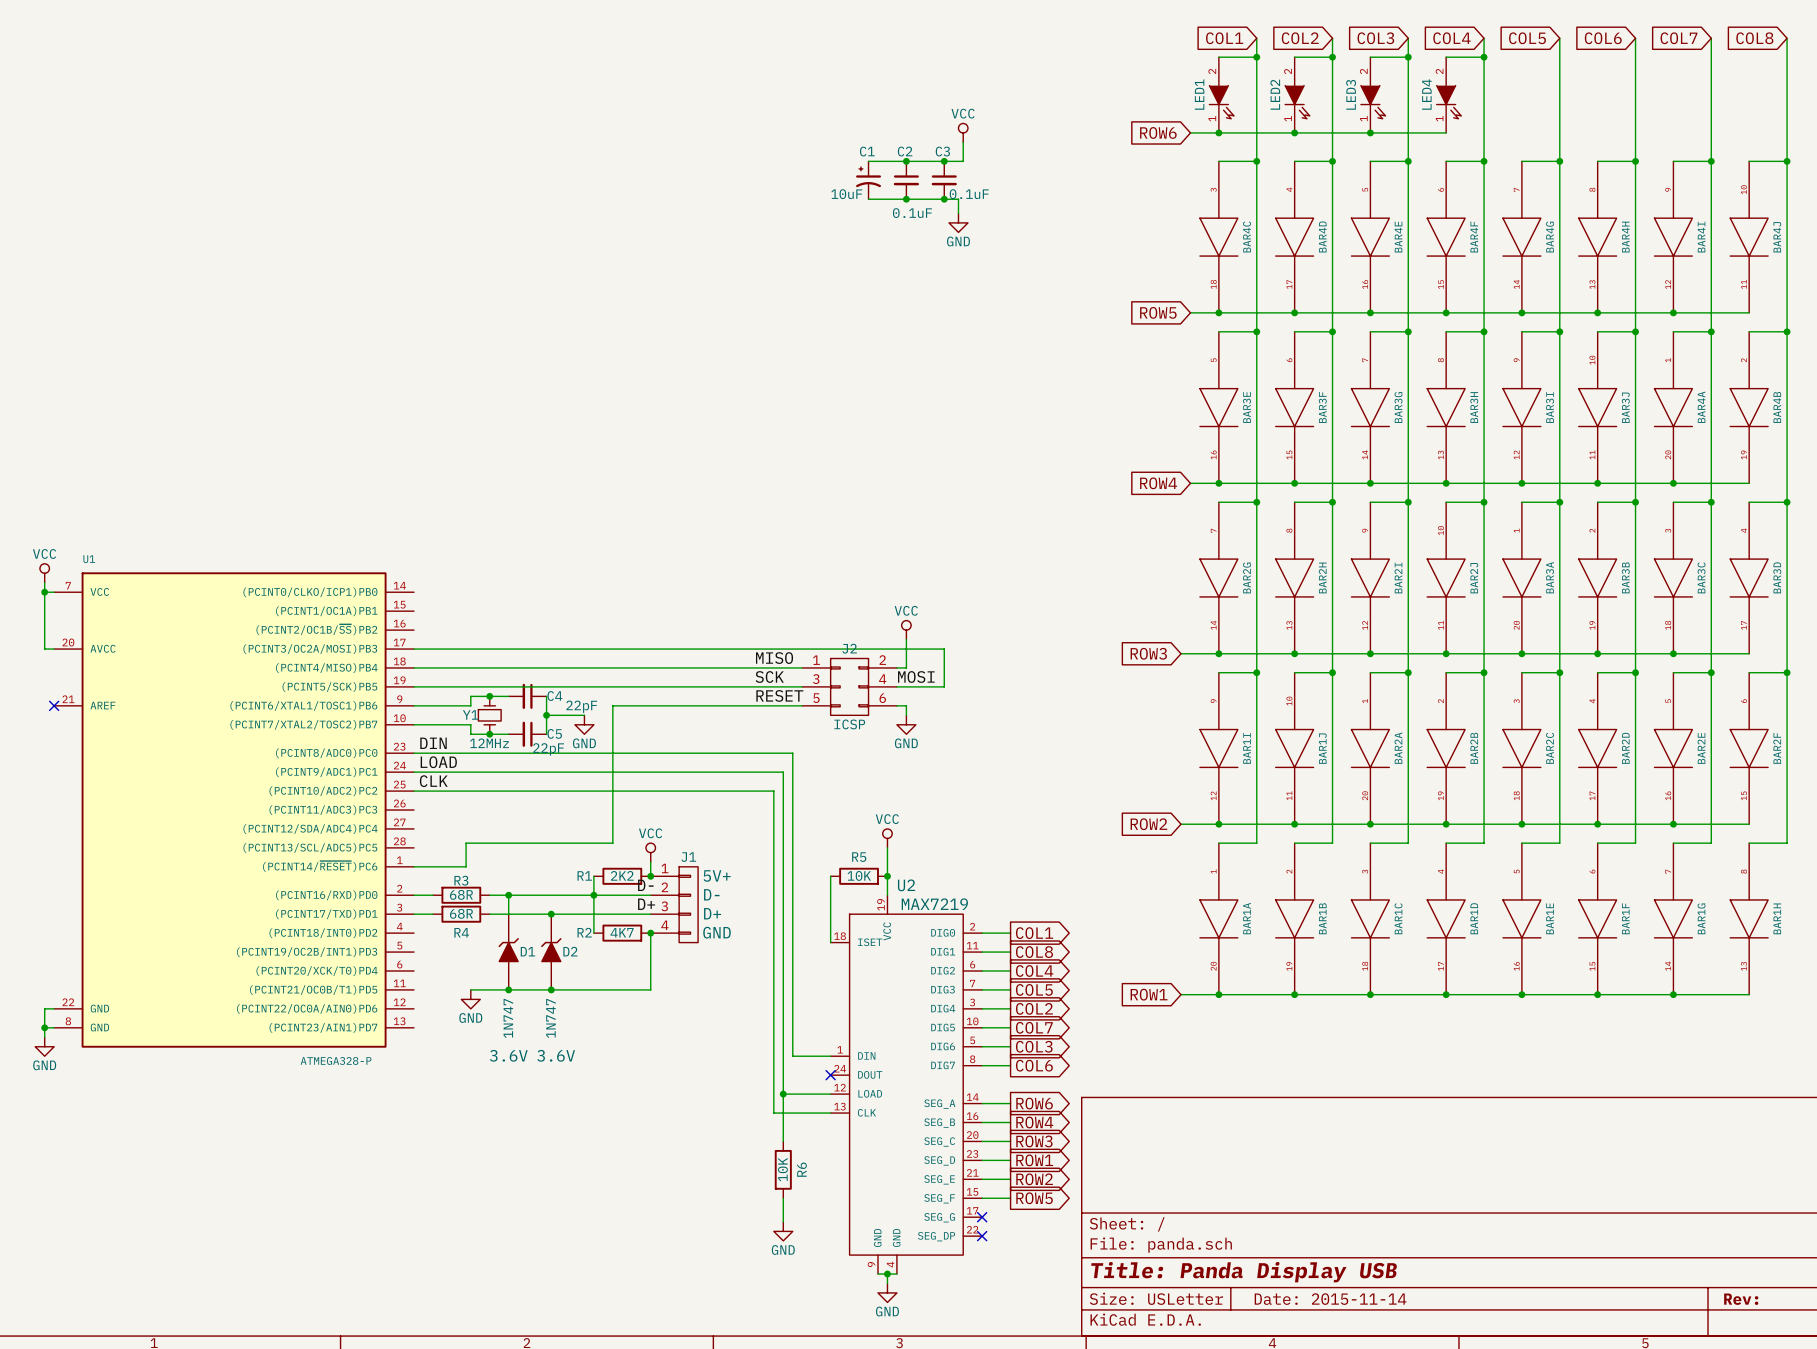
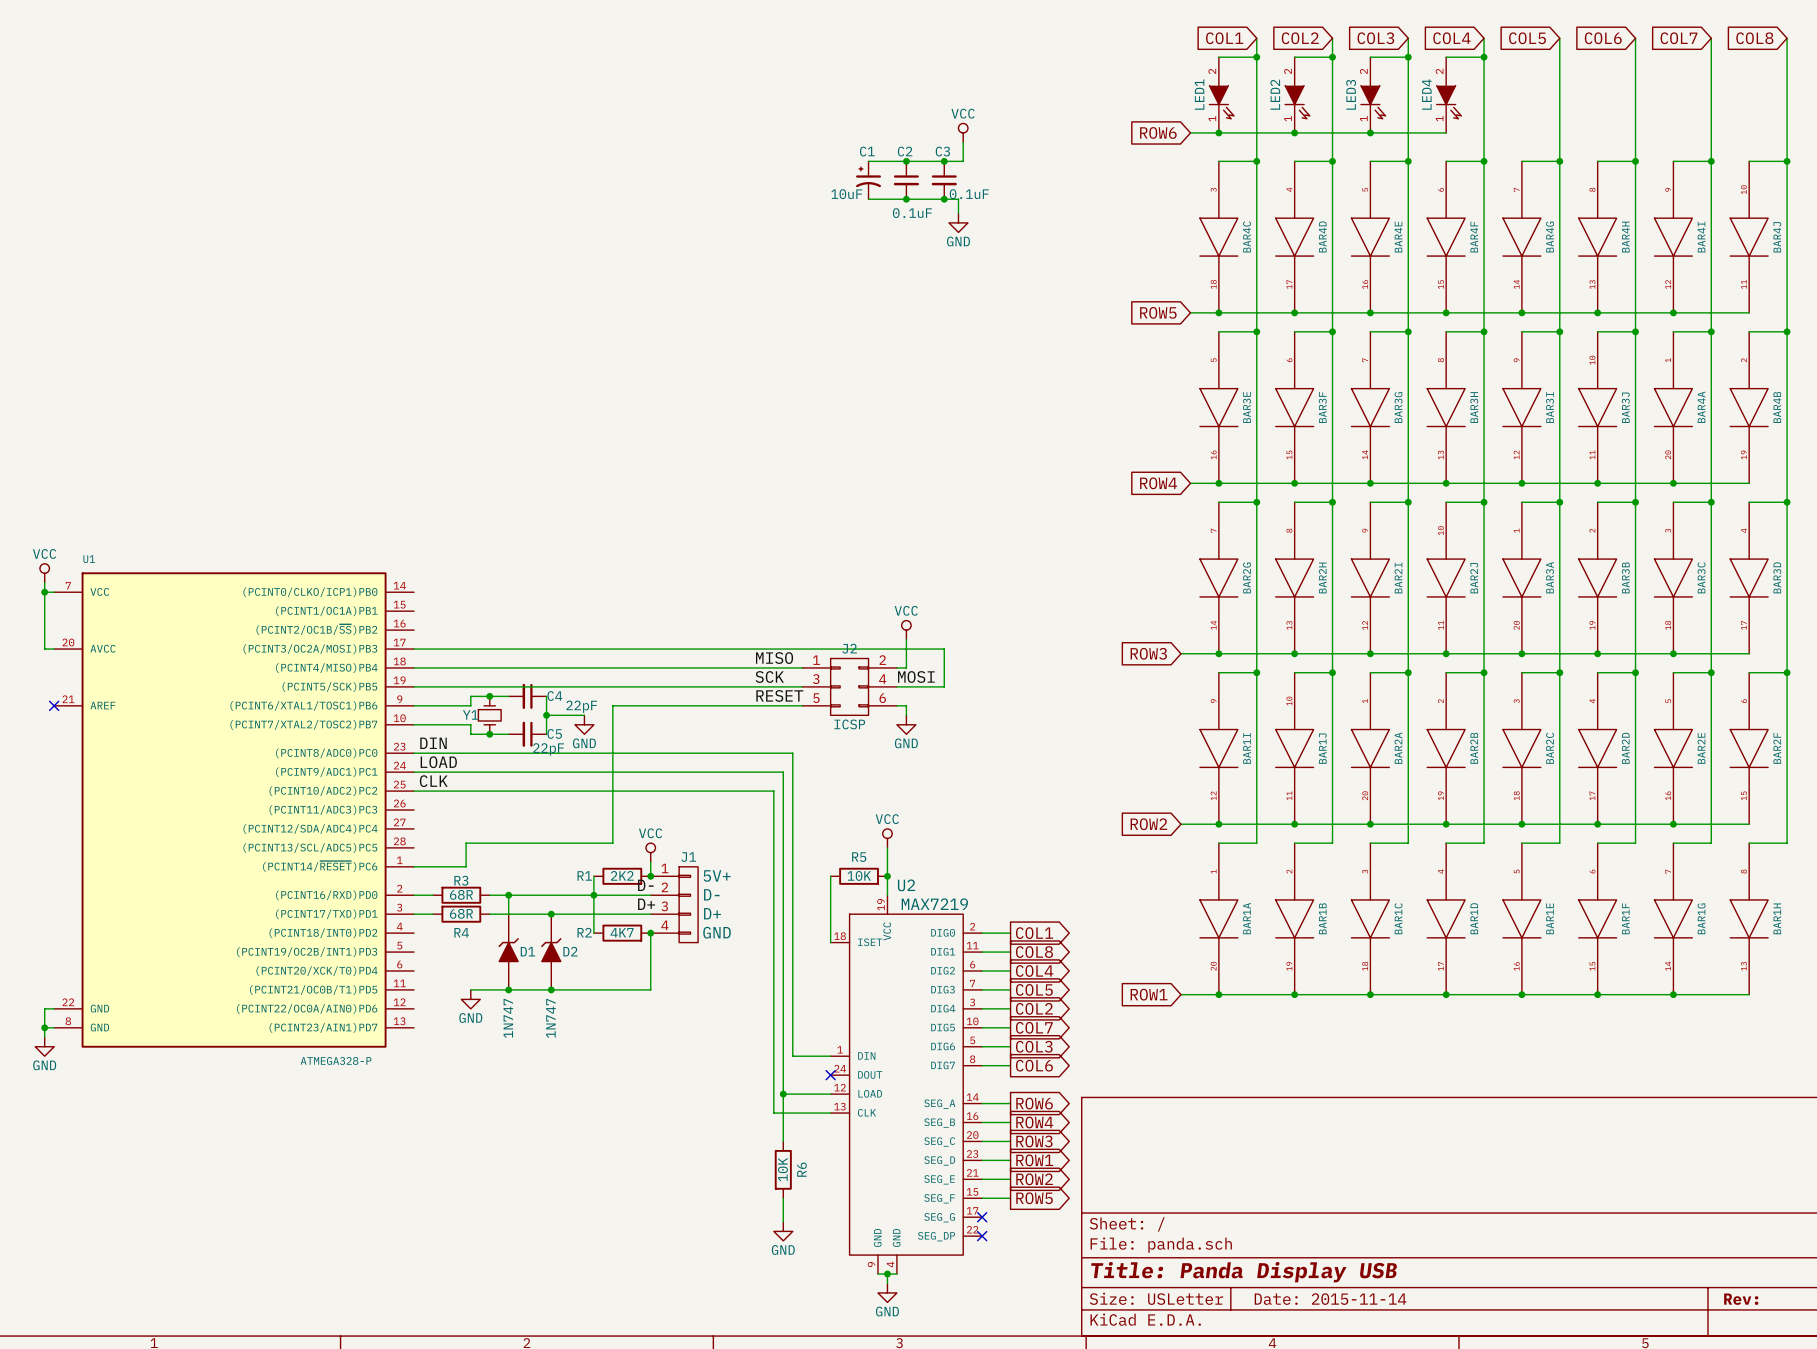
Y1 value: 12MHz (489, 743) -> none
D1 text: 3.6V (508, 1055) -> none
D2 text: 3.6V (556, 1055) -> none

